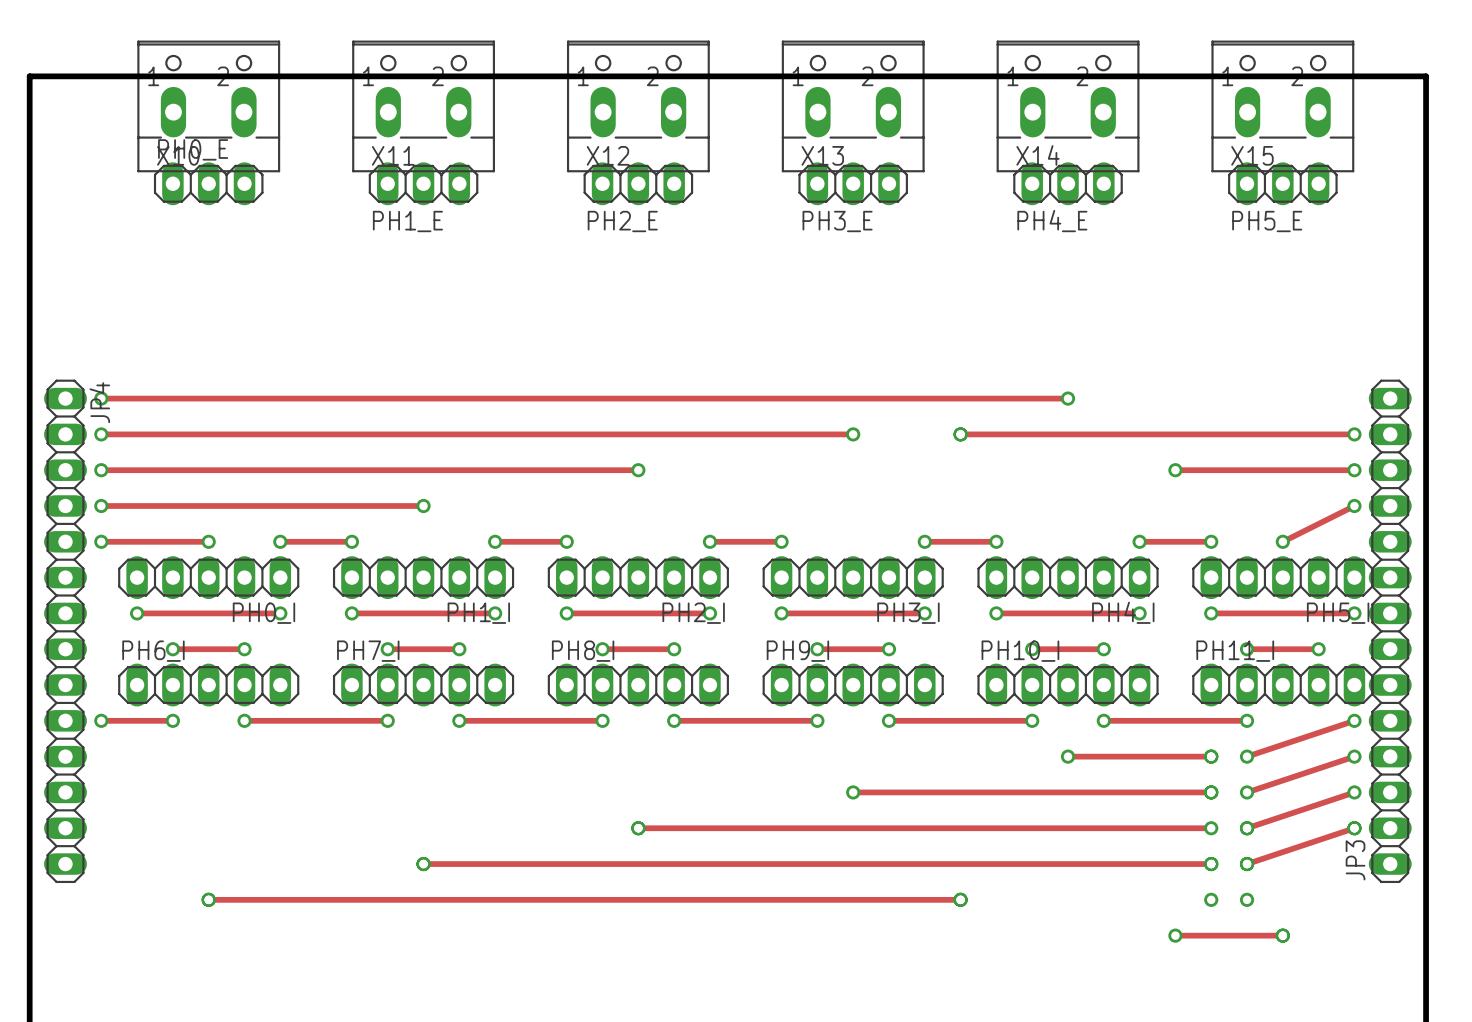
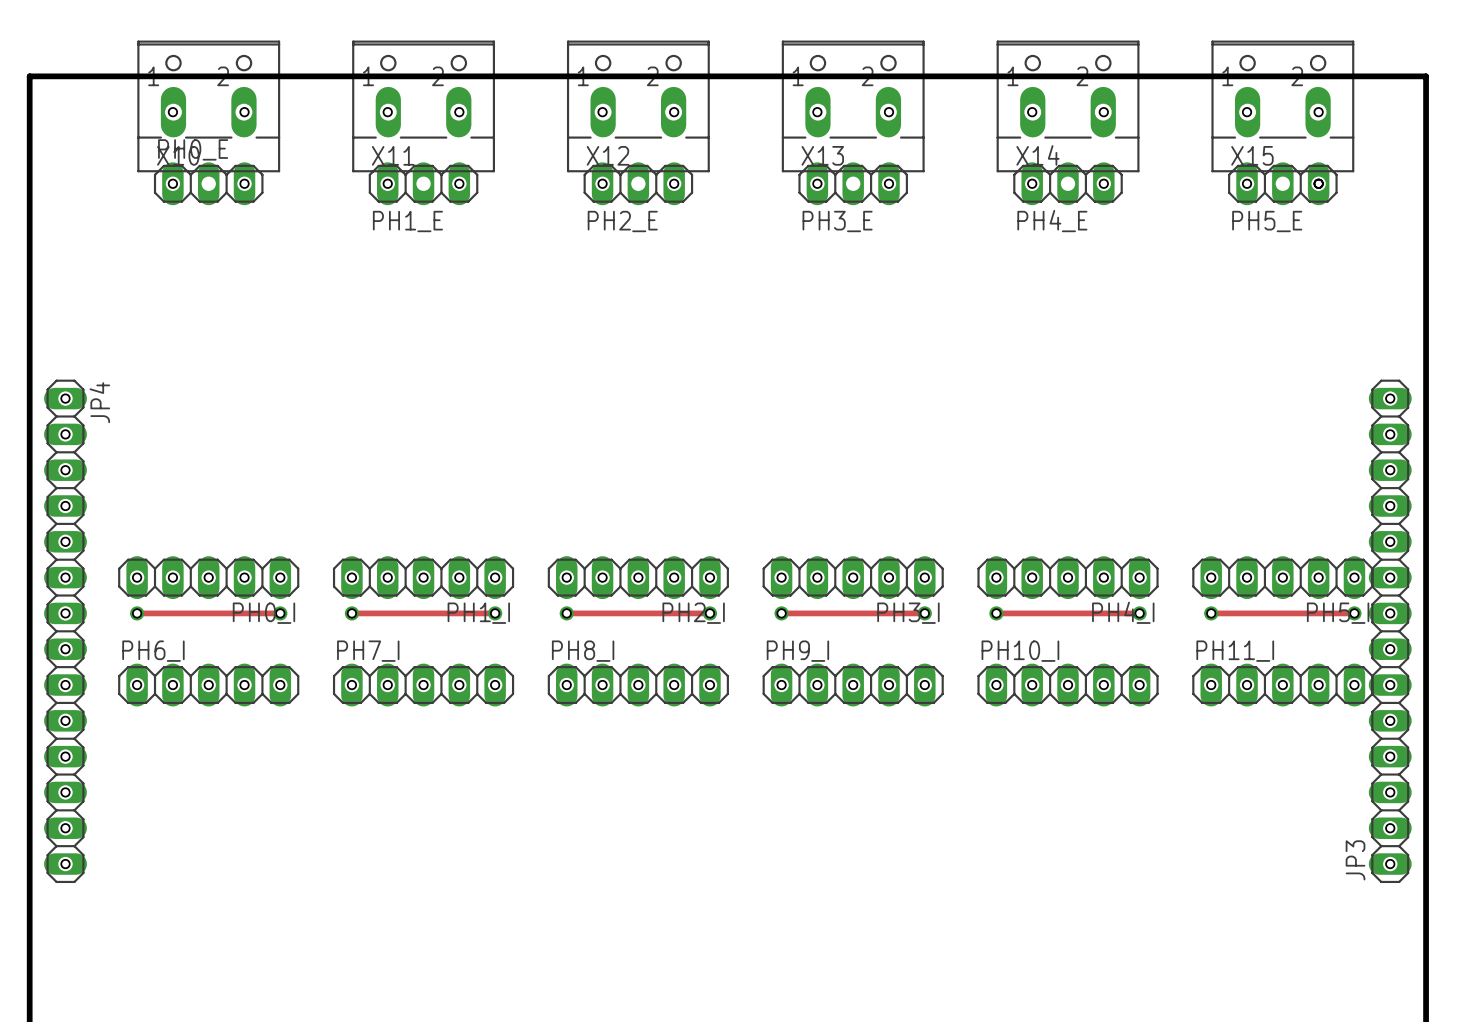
hole: none -> (172, 112)
hole: none -> (244, 112)
hole: none -> (387, 112)
hole: none -> (459, 112)
hole: none -> (602, 112)
hole: none -> (674, 112)
hole: none -> (817, 112)
hole: none -> (888, 112)
hole: none -> (1032, 112)
hole: none -> (1103, 112)
hole: none -> (1247, 112)
hole: none -> (1318, 112)
hole: none -> (172, 183)
hole: none -> (244, 183)
hole: none -> (387, 183)
hole: none -> (459, 183)
hole: none -> (602, 183)
hole: none -> (674, 183)
hole: none -> (817, 183)
hole: none -> (888, 183)
hole: none -> (1032, 183)
hole: none -> (1103, 183)
hole: none -> (1247, 183)
hole: none -> (1318, 183)
hole: none -> (65, 398)
track: (101, 398) (1068, 398) -> none
via: (101, 398) -> none
via: (1068, 398) -> none
hole: none -> (1390, 398)
hole: none -> (65, 434)
track: (101, 434) (853, 434) -> none
via: (101, 434) -> none
via: (853, 434) -> none
track: (960, 434) (1354, 434) -> none
via: (960, 434) -> none
via: (1354, 434) -> none
hole: none -> (1390, 434)
hole: none -> (65, 470)
track: (101, 470) (638, 470) -> none
via: (101, 470) -> none
via: (638, 470) -> none
track: (1175, 470) (1354, 470) -> none
via: (1175, 470) -> none
via: (1354, 470) -> none
hole: none -> (1390, 470)
hole: none -> (65, 506)
track: (101, 506) (423, 506) -> none
via: (101, 506) -> none
via: (423, 506) -> none
track: (1354, 506) (1282, 541) -> none
via: (1354, 506) -> none
hole: none -> (1390, 506)
hole: none -> (65, 541)
track: (101, 541) (208, 541) -> none
via: (101, 541) -> none
via: (208, 541) -> none
track: (280, 541) (351, 541) -> none
via: (280, 541) -> none
via: (351, 541) -> none
track: (495, 541) (566, 541) -> none
via: (495, 541) -> none
via: (566, 541) -> none
track: (709, 541) (781, 541) -> none
via: (709, 541) -> none
via: (781, 541) -> none
track: (924, 541) (996, 541) -> none
via: (924, 541) -> none
via: (996, 541) -> none
track: (1139, 541) (1211, 541) -> none
via: (1139, 541) -> none
via: (1211, 541) -> none
via: (1282, 541) -> none
hole: none -> (1390, 541)
hole: none -> (65, 577)
hole: none -> (137, 577)
hole: none -> (172, 577)
hole: none -> (208, 577)
hole: none -> (244, 577)
hole: none -> (280, 577)
hole: none -> (351, 577)
hole: none -> (387, 577)
hole: none -> (423, 577)
hole: none -> (459, 577)
hole: none -> (495, 577)
hole: none -> (566, 577)
hole: none -> (602, 577)
hole: none -> (638, 577)
hole: none -> (674, 577)
hole: none -> (709, 577)
hole: none -> (781, 577)
hole: none -> (817, 577)
hole: none -> (853, 577)
hole: none -> (888, 577)
hole: none -> (924, 577)
hole: none -> (996, 577)
hole: none -> (1032, 577)
hole: none -> (1068, 577)
hole: none -> (1103, 577)
hole: none -> (1139, 577)
hole: none -> (1211, 577)
hole: none -> (1247, 577)
hole: none -> (1282, 577)
hole: none -> (1318, 577)
hole: none -> (1354, 577)
hole: none -> (1390, 577)
hole: none -> (65, 613)
hole: none -> (137, 613)
hole: none -> (280, 613)
hole: none -> (351, 613)
hole: none -> (495, 613)
hole: none -> (566, 613)
hole: none -> (709, 613)
hole: none -> (781, 613)
hole: none -> (924, 613)
hole: none -> (996, 613)
hole: none -> (1139, 613)
hole: none -> (1211, 613)
hole: none -> (1354, 613)
hole: none -> (1390, 613)
hole: none -> (65, 649)
track: (172, 649) (244, 649) -> none
via: (172, 649) -> none
via: (244, 649) -> none
track: (387, 649) (459, 649) -> none
via: (387, 649) -> none
via: (459, 649) -> none
track: (602, 649) (674, 649) -> none
via: (602, 649) -> none
via: (674, 649) -> none
track: (817, 649) (888, 649) -> none
via: (817, 649) -> none
via: (888, 649) -> none
track: (1032, 649) (1103, 649) -> none
via: (1032, 649) -> none
via: (1103, 649) -> none
track: (1247, 649) (1318, 649) -> none
via: (1247, 649) -> none
via: (1318, 649) -> none
hole: none -> (1390, 649)
hole: none -> (65, 685)
hole: none -> (137, 685)
hole: none -> (172, 685)
hole: none -> (208, 685)
hole: none -> (244, 685)
hole: none -> (280, 685)
hole: none -> (351, 685)
hole: none -> (387, 685)
hole: none -> (423, 685)
hole: none -> (459, 685)
hole: none -> (495, 685)
hole: none -> (566, 685)
hole: none -> (602, 685)
hole: none -> (638, 685)
hole: none -> (674, 685)
hole: none -> (709, 685)
hole: none -> (781, 685)
hole: none -> (817, 685)
hole: none -> (853, 685)
hole: none -> (888, 685)
hole: none -> (924, 685)
hole: none -> (996, 685)
hole: none -> (1032, 685)
hole: none -> (1068, 685)
hole: none -> (1103, 685)
hole: none -> (1139, 685)
hole: none -> (1211, 685)
hole: none -> (1247, 685)
hole: none -> (1282, 685)
hole: none -> (1318, 685)
hole: none -> (1354, 685)
hole: none -> (1390, 685)
hole: none -> (65, 720)
track: (101, 720) (172, 720) -> none
via: (101, 720) -> none
via: (172, 720) -> none
track: (244, 720) (387, 720) -> none
via: (244, 720) -> none
via: (387, 720) -> none
track: (459, 720) (602, 720) -> none
via: (459, 720) -> none
via: (602, 720) -> none
track: (674, 720) (817, 720) -> none
via: (674, 720) -> none
via: (817, 720) -> none
track: (888, 720) (1032, 720) -> none
via: (888, 720) -> none
via: (1032, 720) -> none
track: (1103, 720) (1247, 720) -> none
via: (1103, 720) -> none
via: (1247, 720) -> none
track: (1354, 720) (1247, 756) -> none
via: (1354, 720) -> none
hole: none -> (1390, 720)
hole: none -> (65, 756)
track: (1068, 756) (1211, 756) -> none
via: (1068, 756) -> none
via: (1211, 756) -> none
via: (1247, 756) -> none
track: (1354, 756) (1247, 792) -> none
via: (1354, 756) -> none
hole: none -> (1390, 756)
hole: none -> (65, 792)
track: (853, 792) (1211, 792) -> none
via: (853, 792) -> none
via: (1211, 792) -> none
via: (1247, 792) -> none
track: (1354, 792) (1247, 828) -> none
via: (1354, 792) -> none
hole: none -> (1390, 792)
hole: none -> (65, 828)
track: (638, 828) (1211, 828) -> none
via: (638, 828) -> none
via: (1211, 828) -> none
via: (1247, 828) -> none
track: (1354, 828) (1247, 864) -> none
via: (1354, 828) -> none
hole: none -> (1390, 828)
hole: none -> (65, 864)
track: (423, 864) (1211, 864) -> none
via: (423, 864) -> none
via: (1211, 864) -> none
via: (1247, 864) -> none
hole: none -> (1390, 864)
track: (208, 899) (960, 899) -> none
via: (208, 899) -> none
via: (960, 899) -> none
via: (1211, 899) -> none
via: (1247, 899) -> none
track: (1175, 935) (1282, 935) -> none
via: (1175, 935) -> none
via: (1282, 935) -> none

